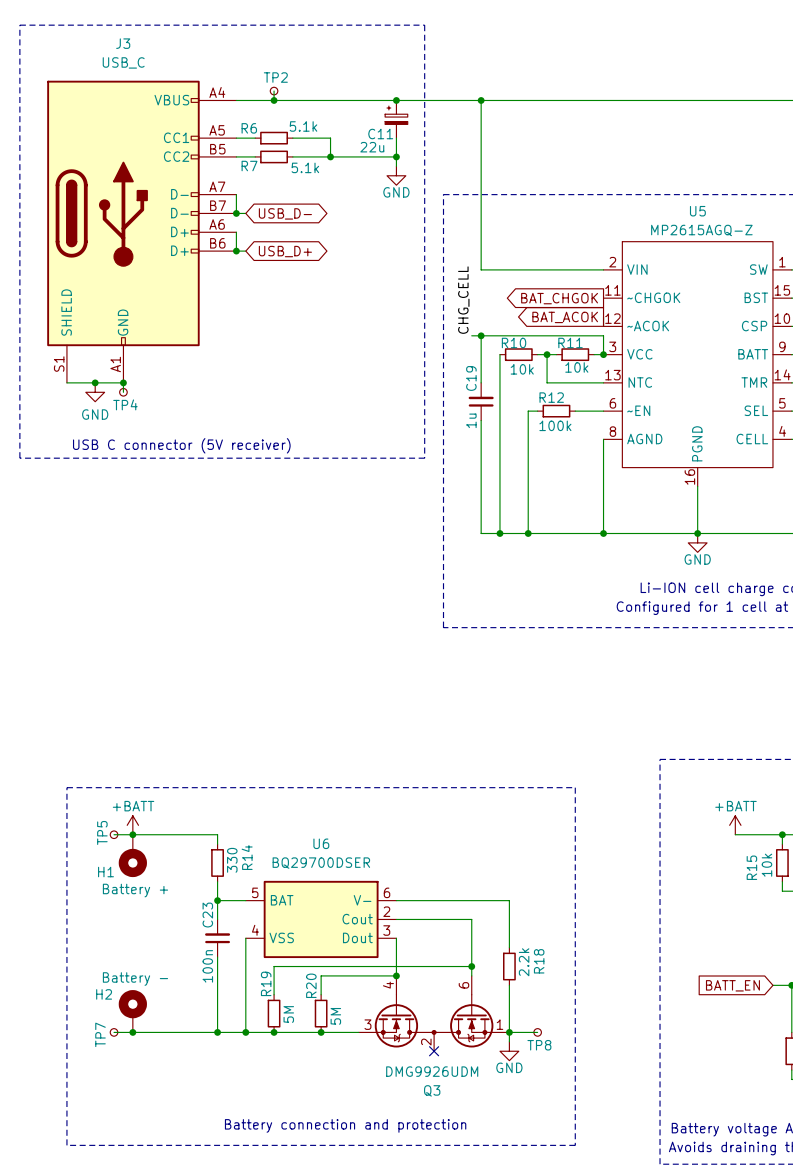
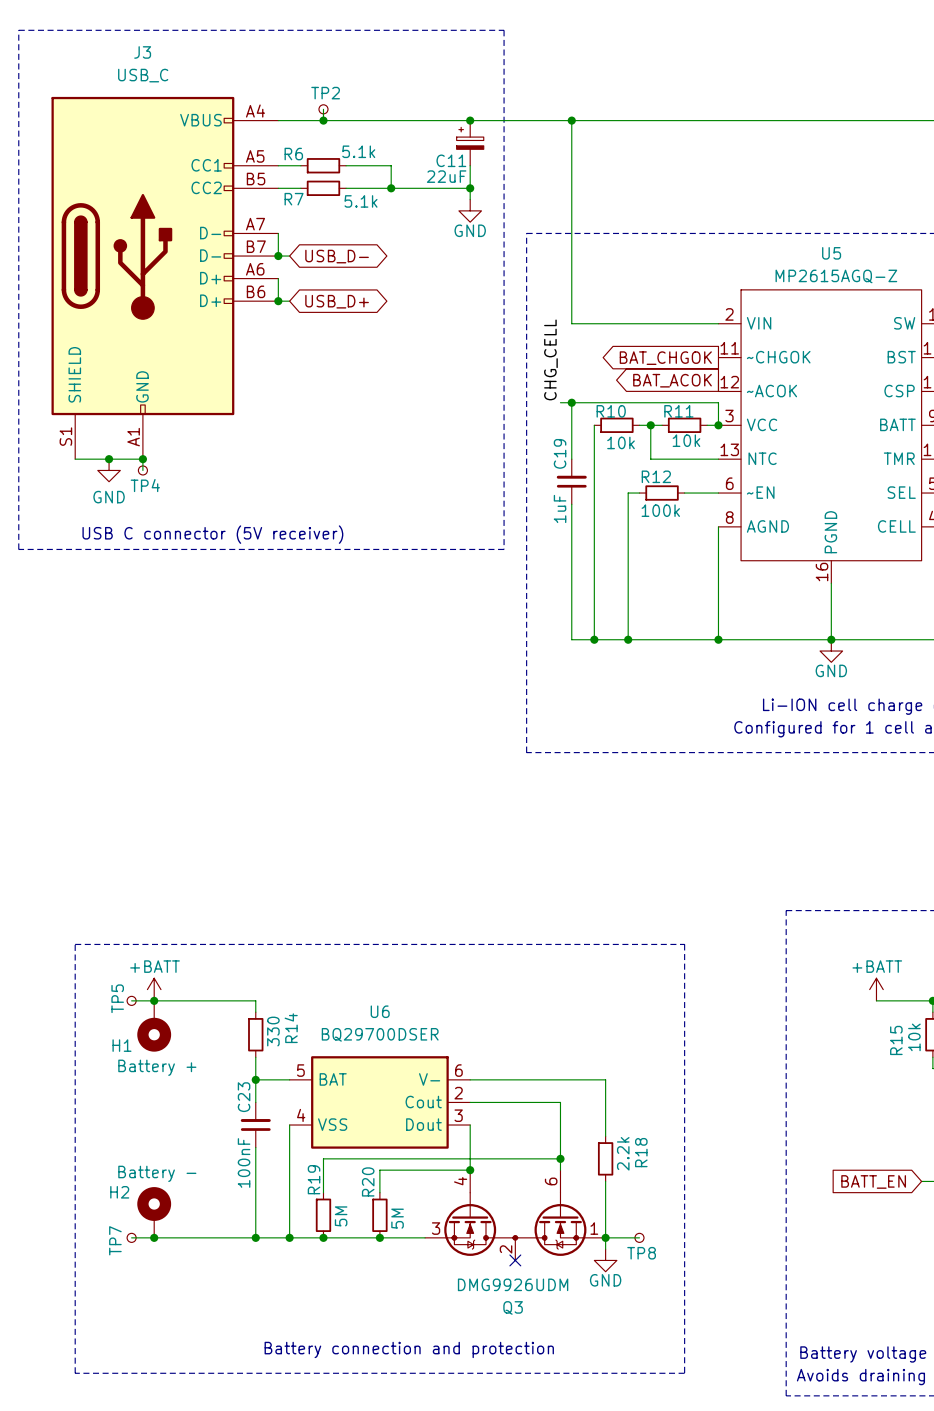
C11 value: 22u (372, 147) -> 22uF (446, 176)
C19 value: 1u (471, 420) -> 1uF (560, 508)
C23 value: 100n (207, 966) -> 100nF (244, 1162)

